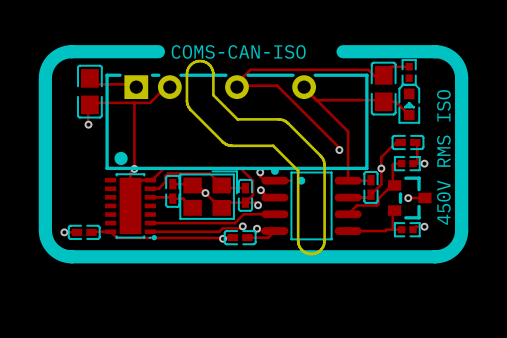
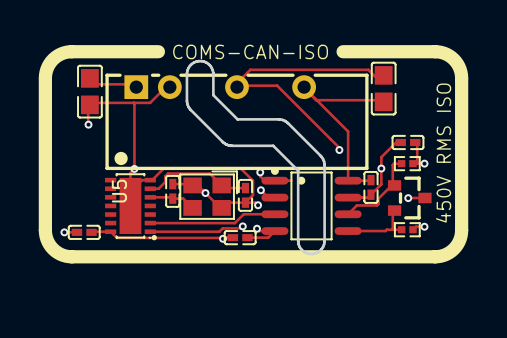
track: (409, 66) (392, 66) (383, 75) -> none
part: (409, 72) -> none
track: (383, 101) (395, 101) (409, 115) -> none
part: (409, 103) -> none
U5 name: none -> U5 (119, 191)

